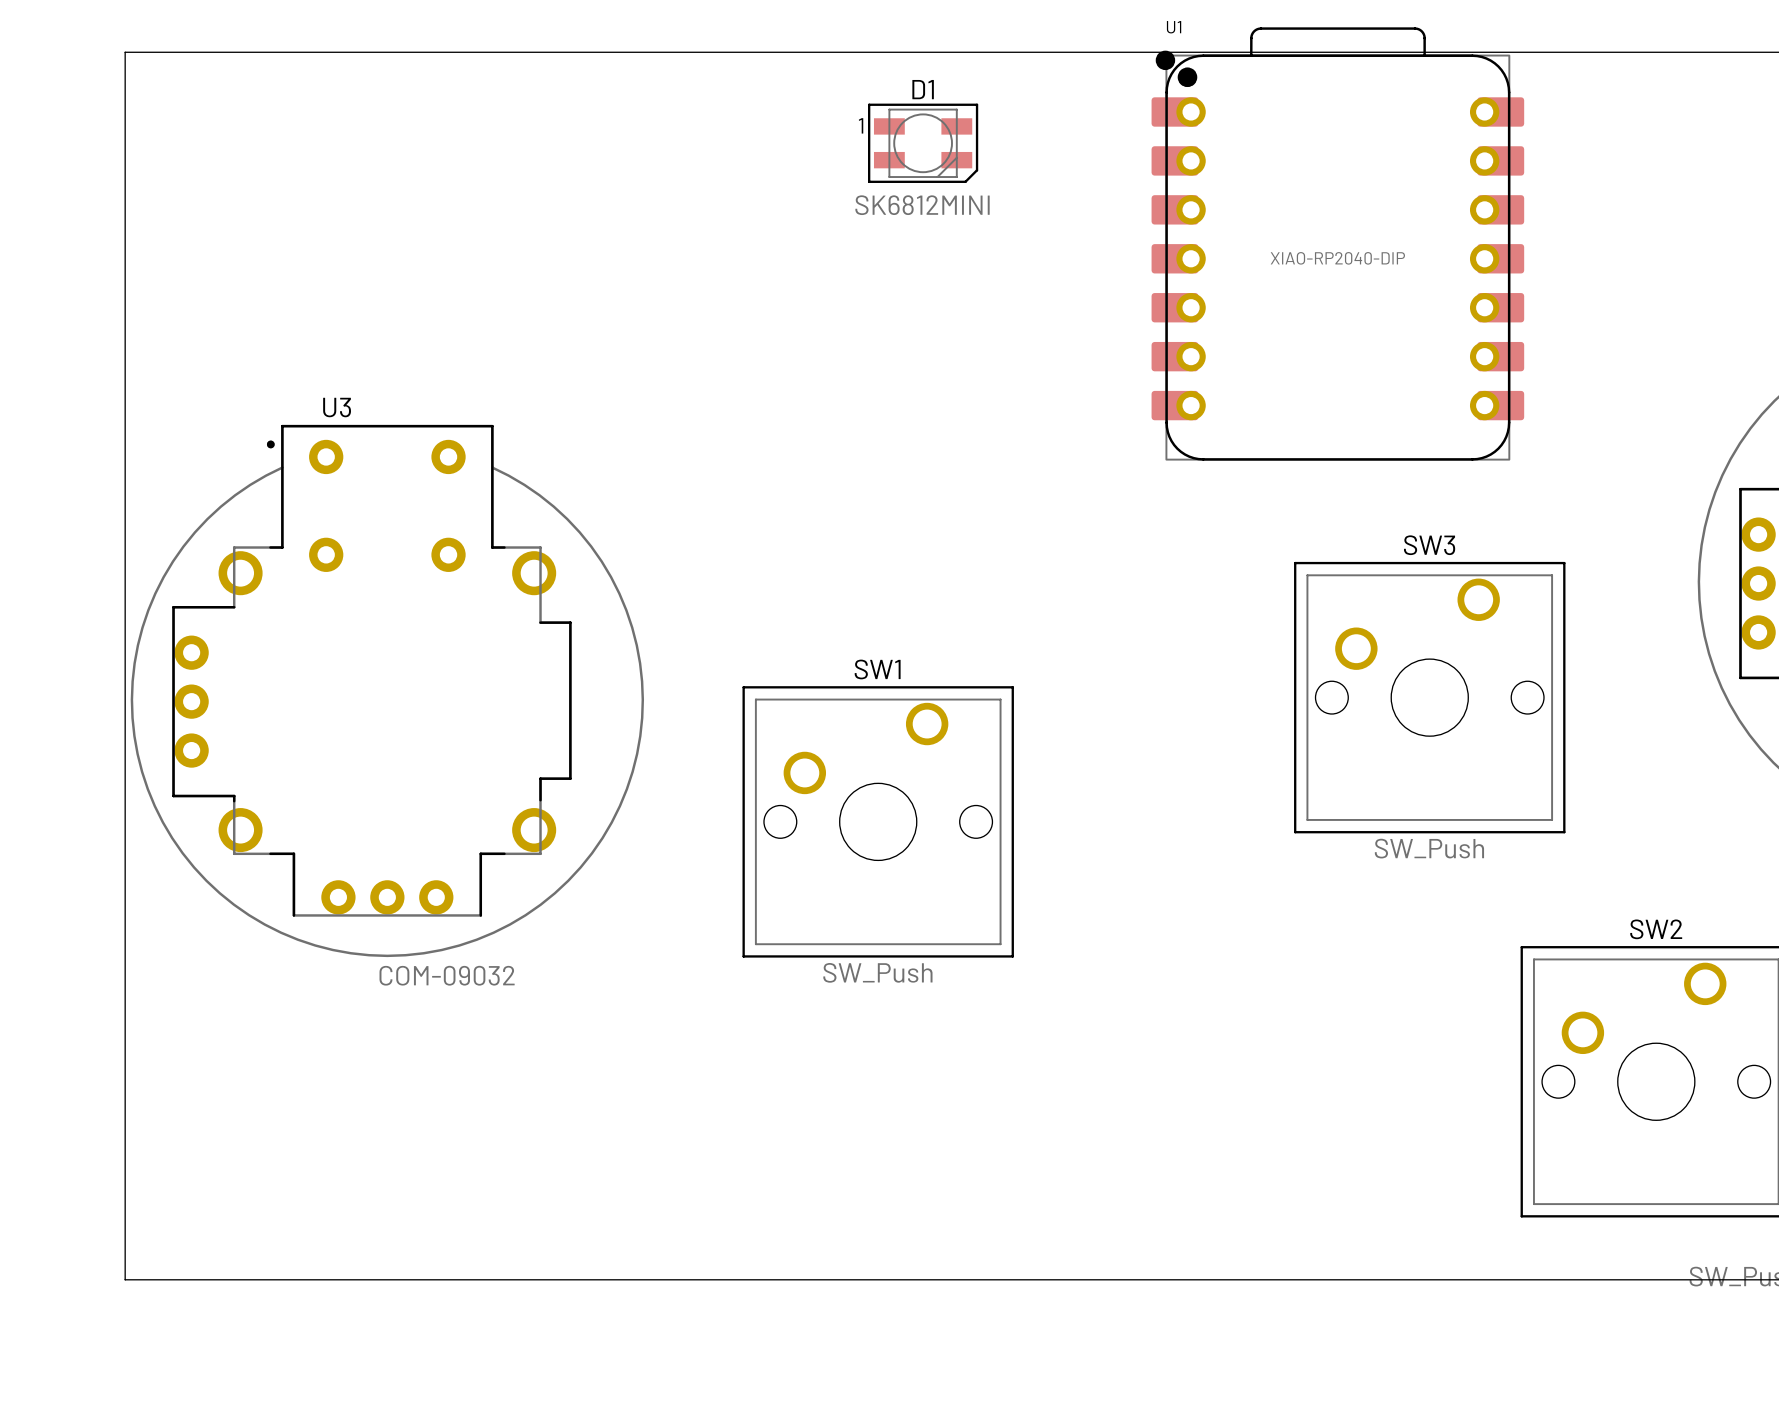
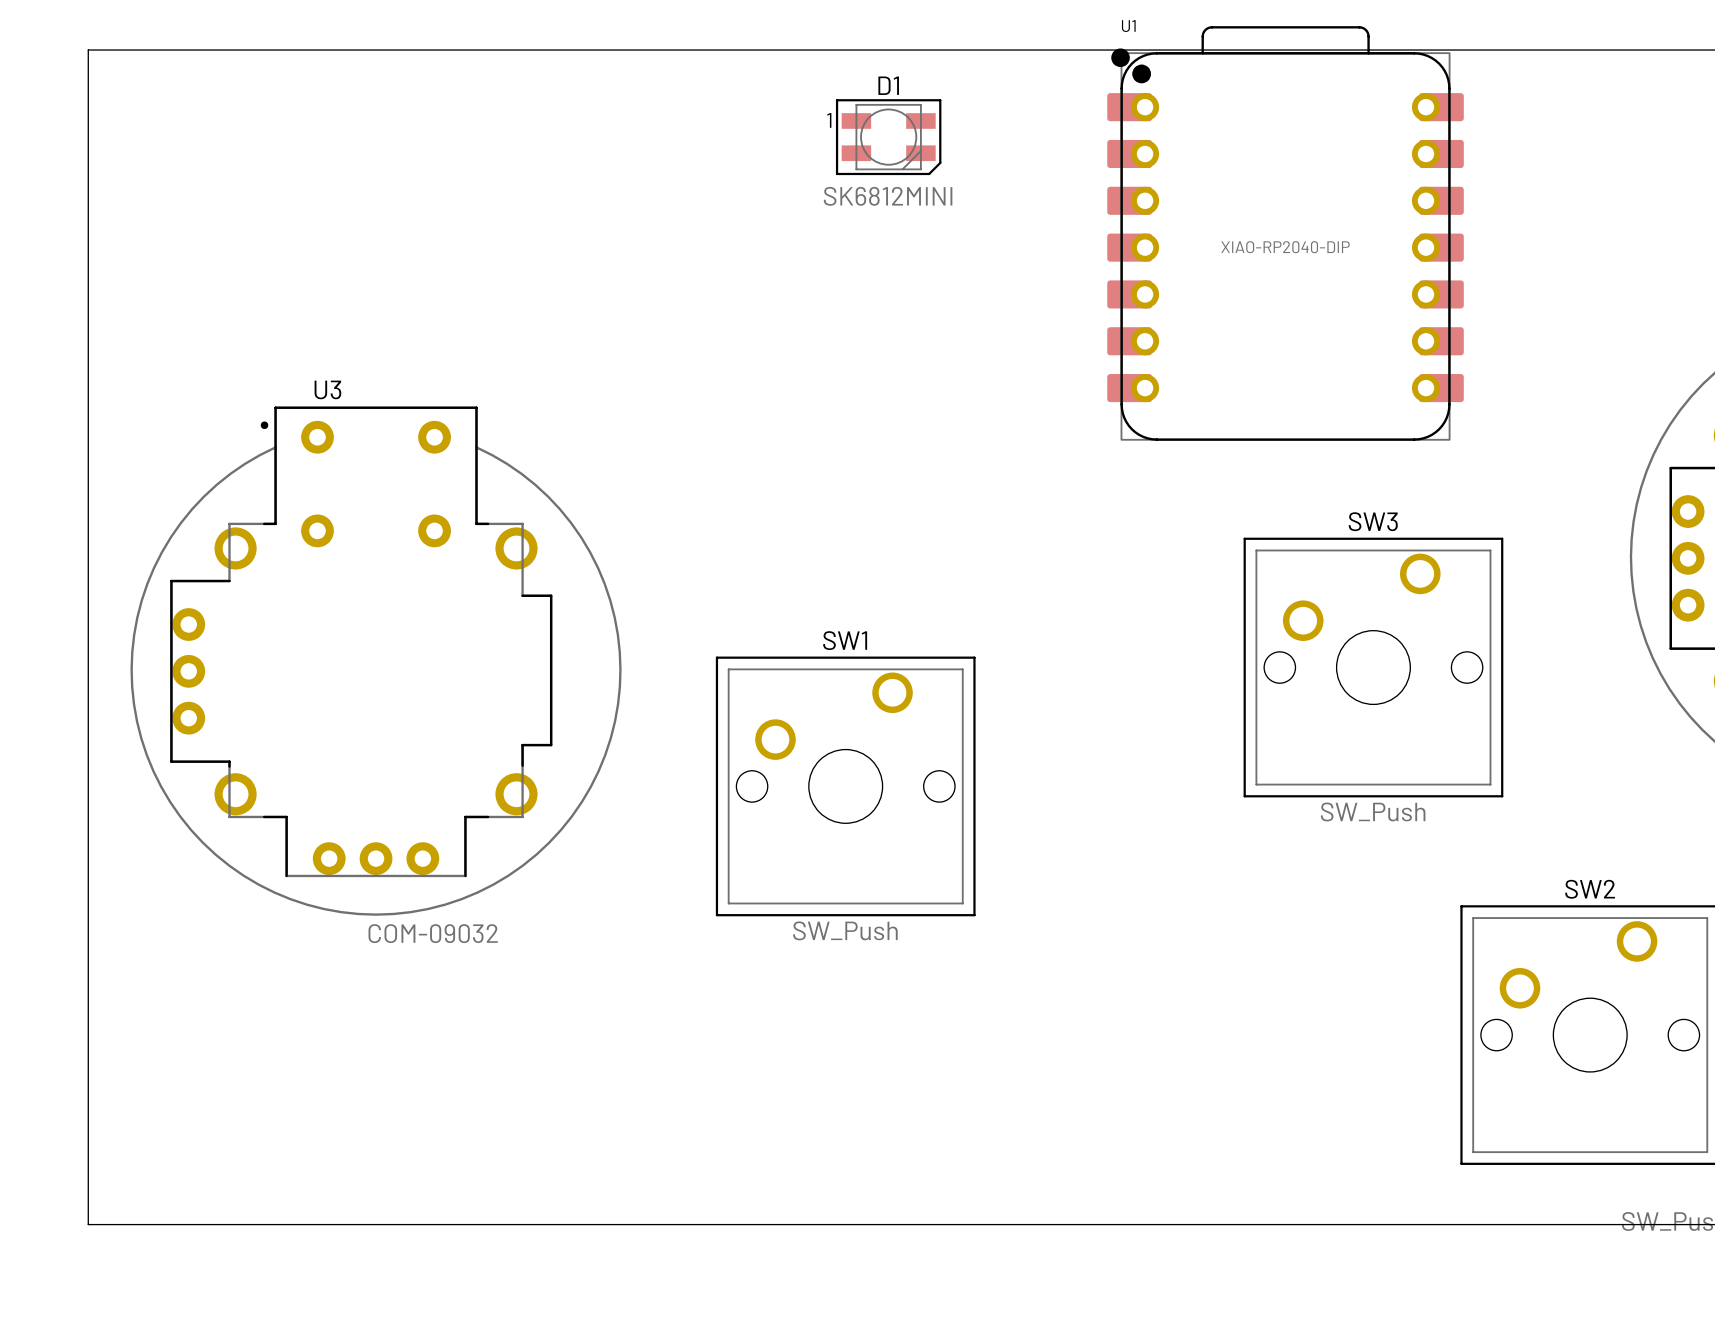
board edge: (125, 52) (125, 1279) -> (125, 50) (88, 50) (88, 1224) (125, 1224)

